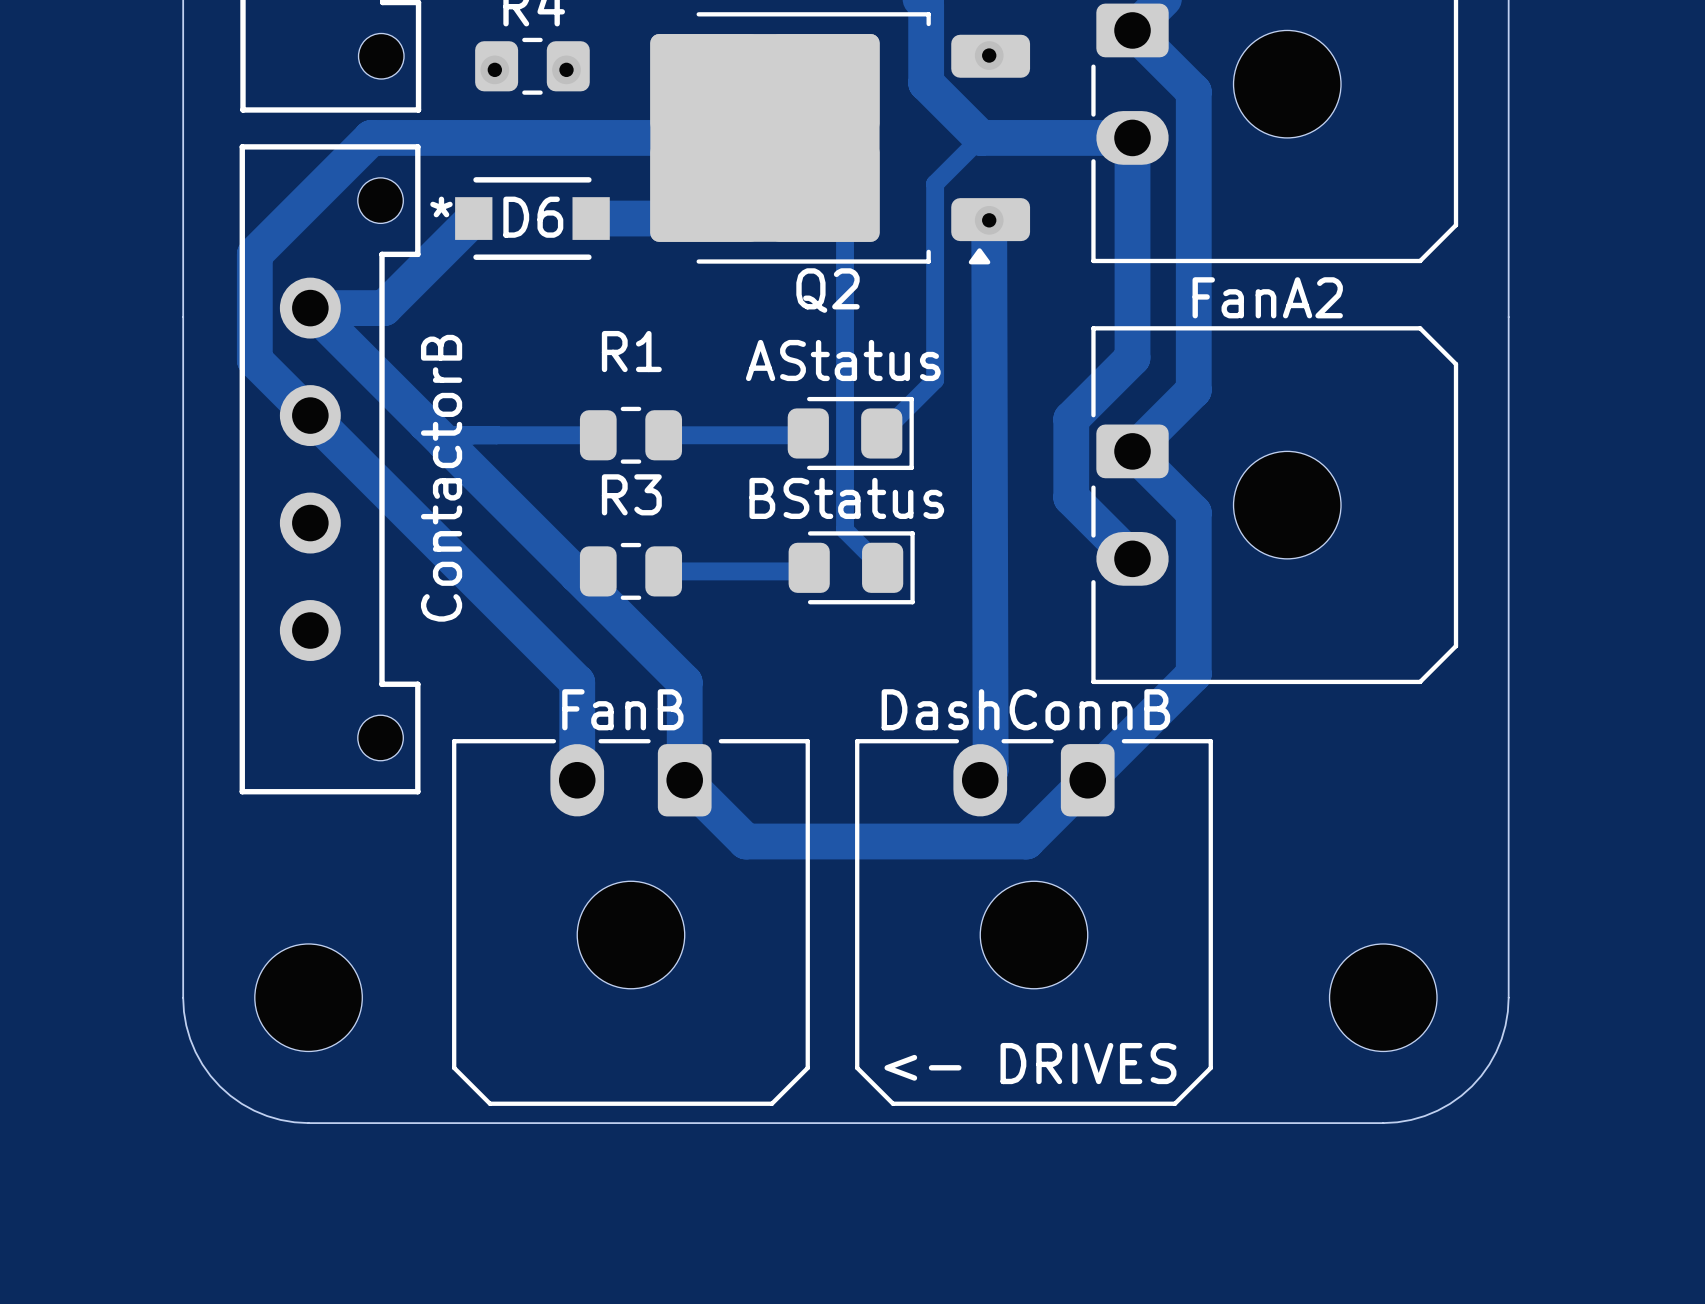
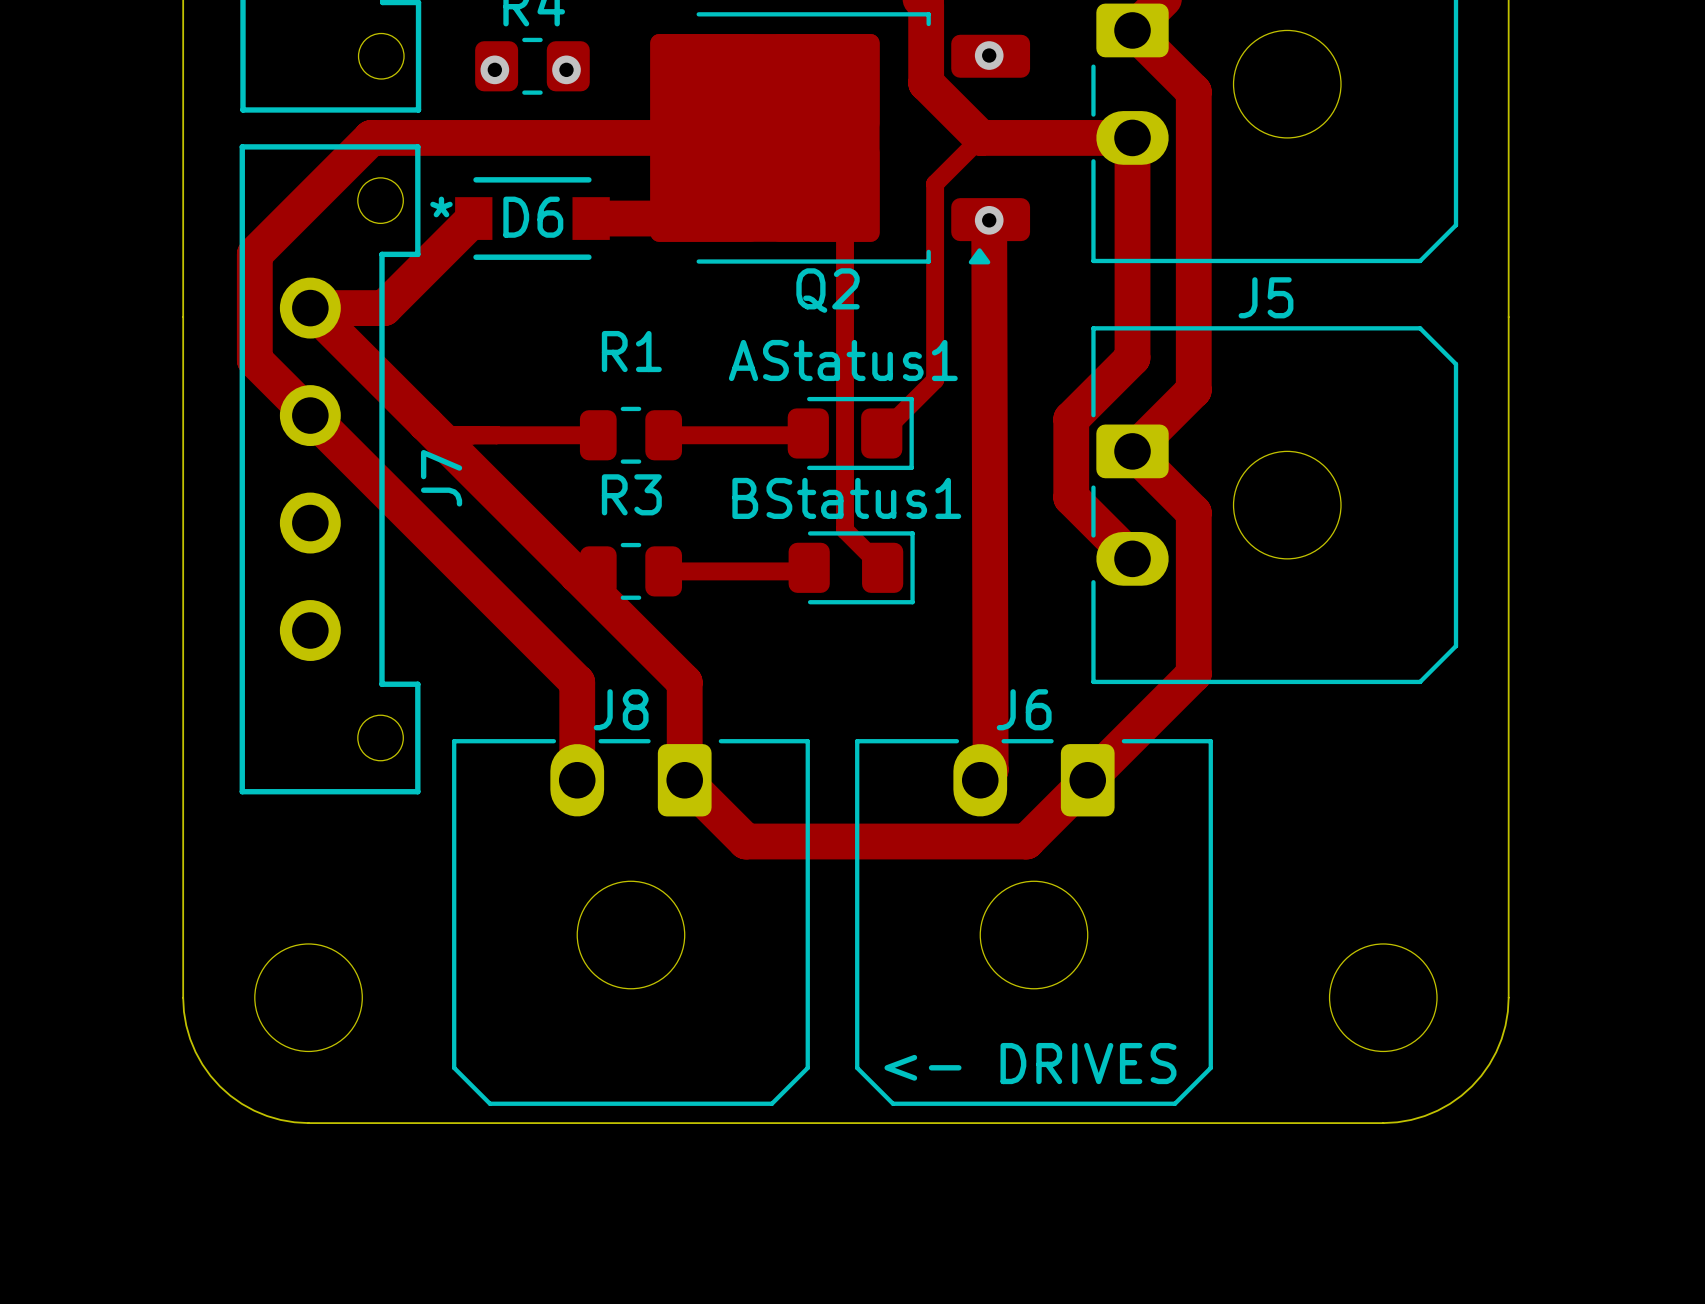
FanA2 name: FanA2 (1267, 297) -> J5 (1266, 297)
AStatus name: AStatus (843, 360) -> AStatus1 (843, 360)
ContactorB name: ContactorB (441, 478) -> J7 (441, 478)
BStatus name: BStatus (846, 498) -> BStatus1 (846, 498)
FanB name: FanB (622, 709) -> J8 (621, 709)
DashConnB name: DashConnB (1025, 709) -> J6 (1024, 709)

